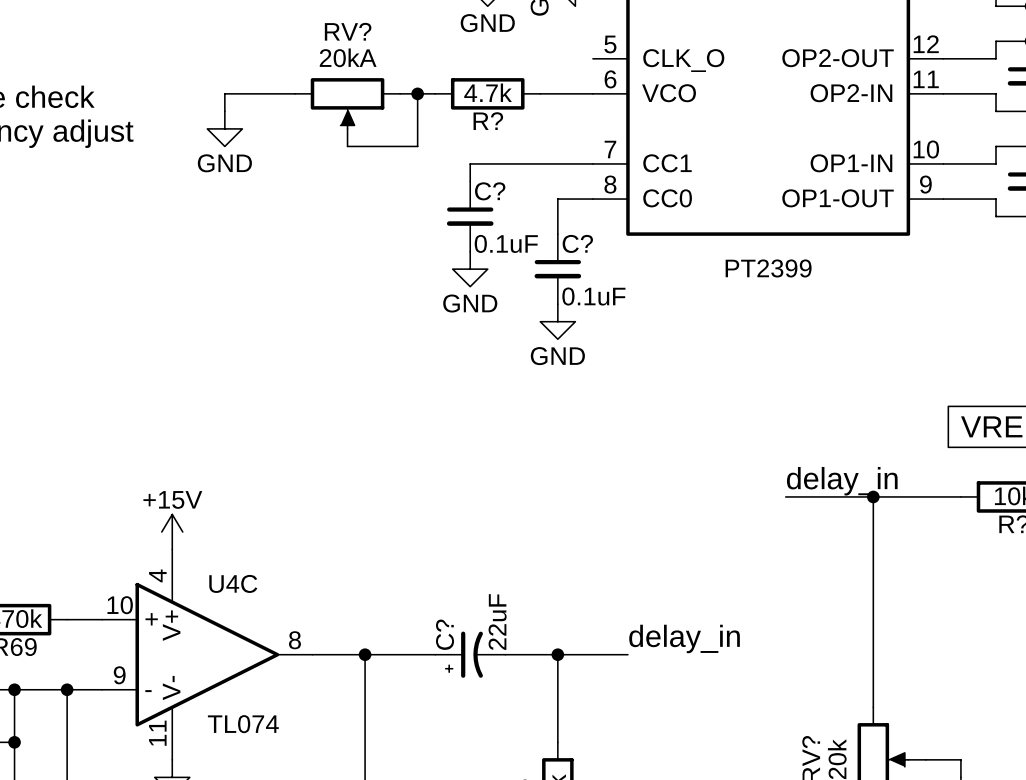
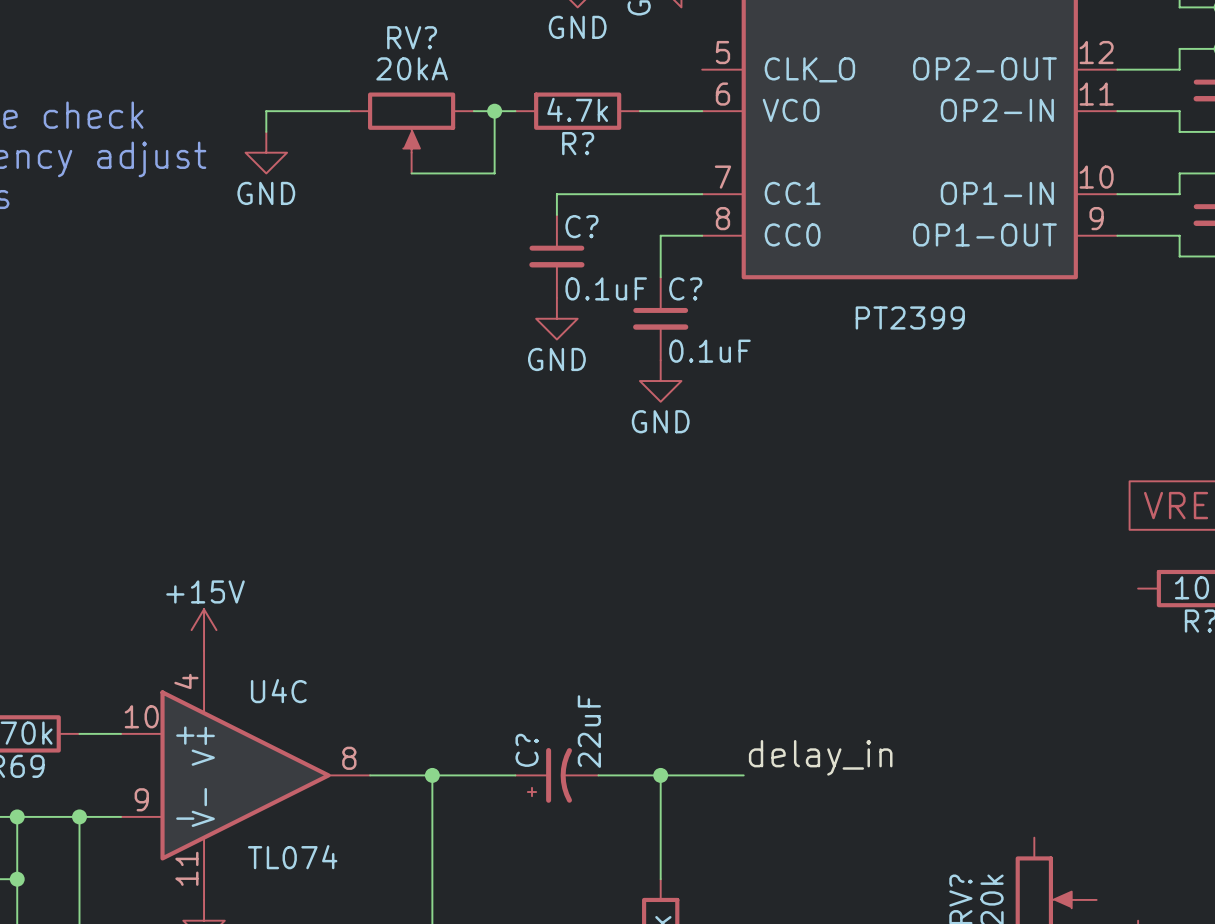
label: delay_in (842, 481) -> none
wire: (785, 496) (960, 496) -> none
wire: (873, 496) (873, 707) -> none
junction: (873, 496) -> none
wire: (925, 759) (960, 759) (960, 777) -> none

